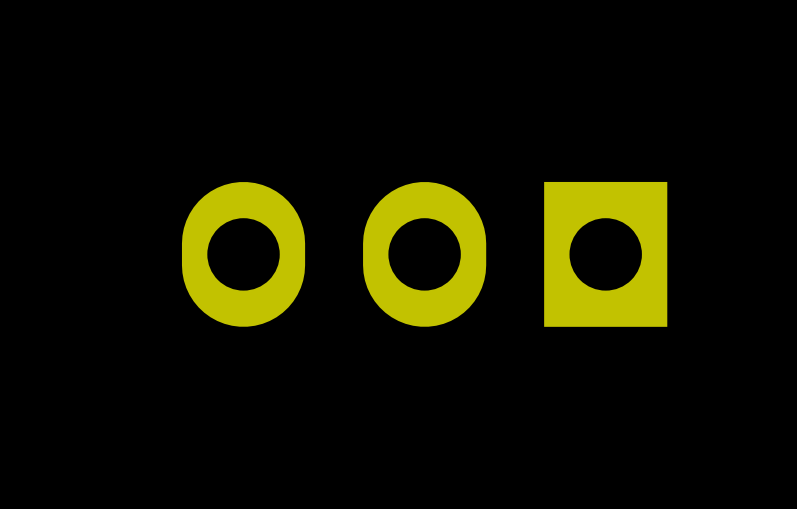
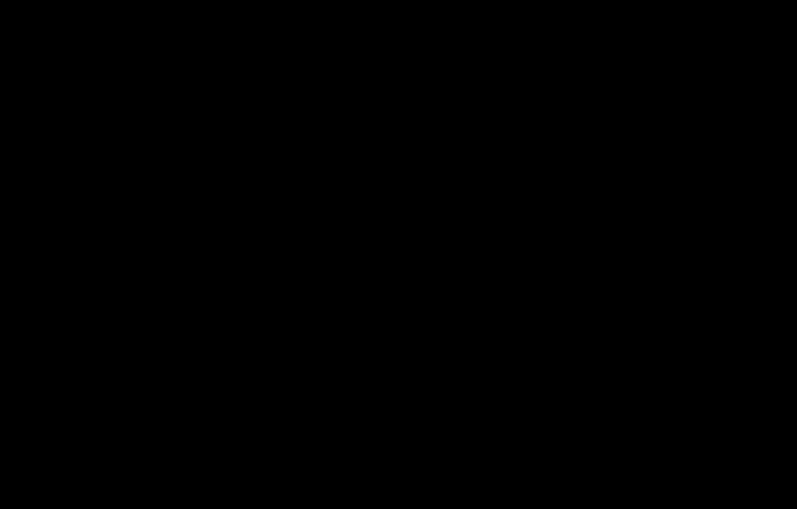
part: (424, 254) -> none

